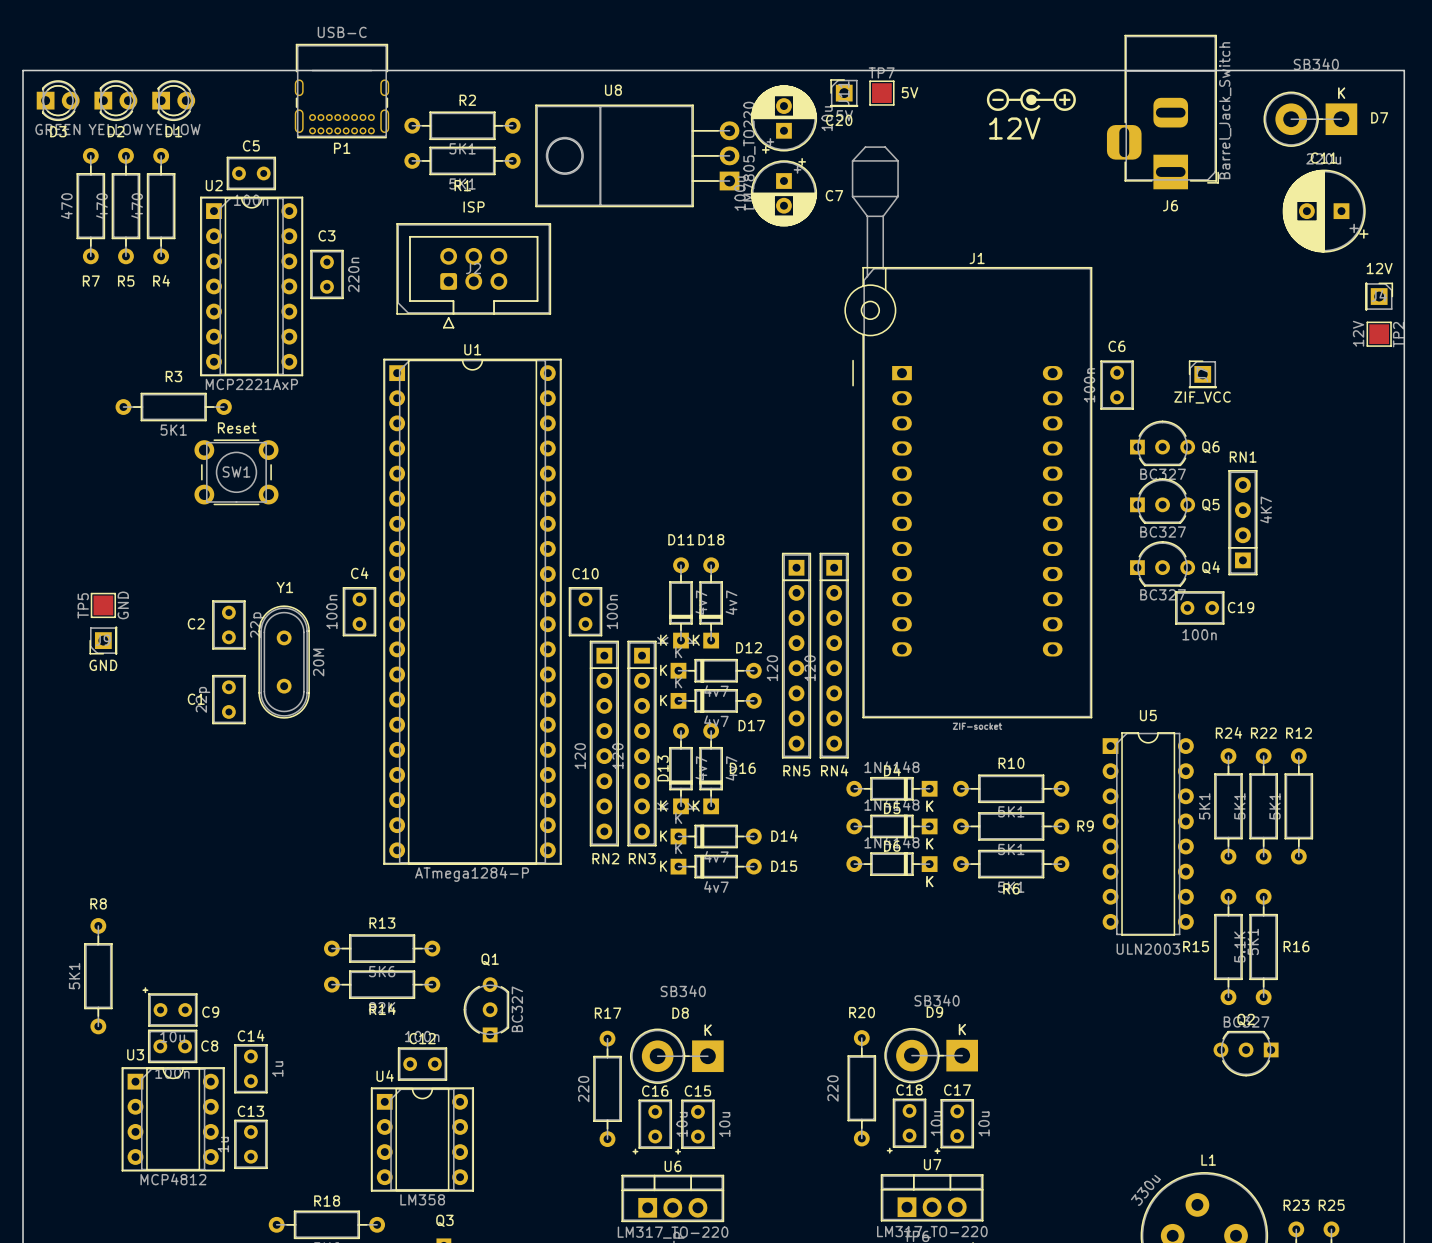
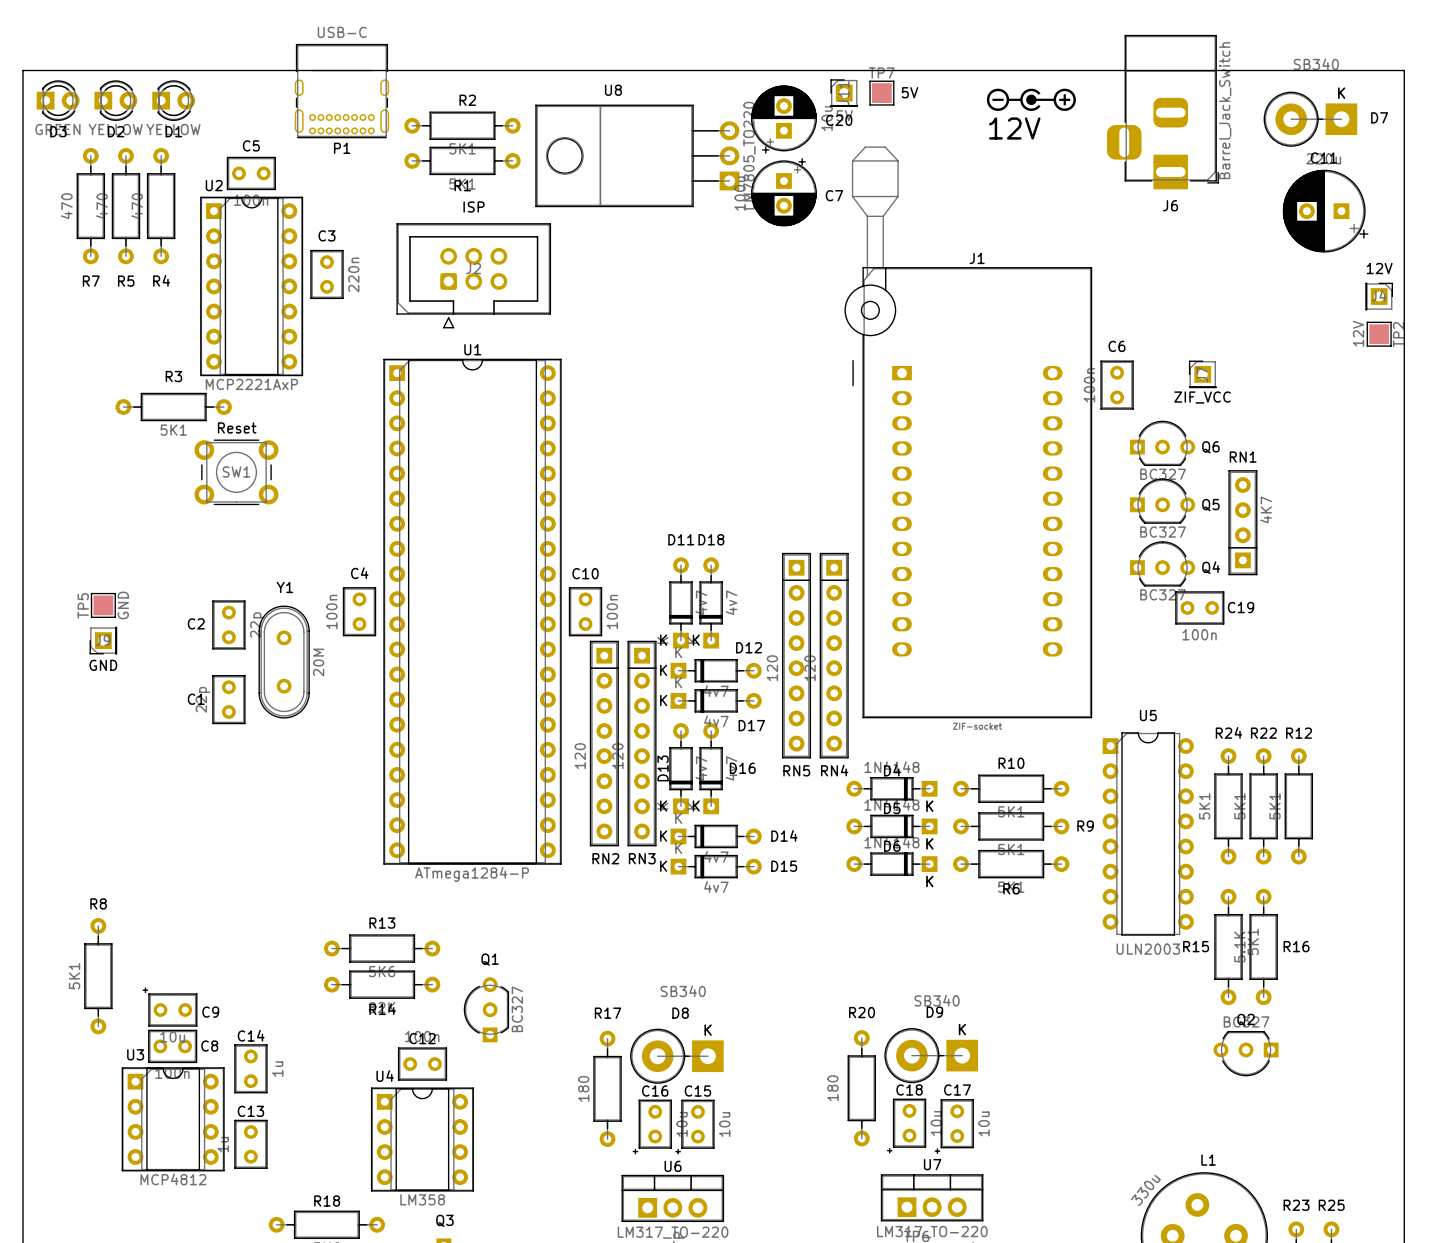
R20 value: 220 (832, 1088) -> 180 (832, 1088)
R17 value: 220 (583, 1089) -> 180 (583, 1088)

